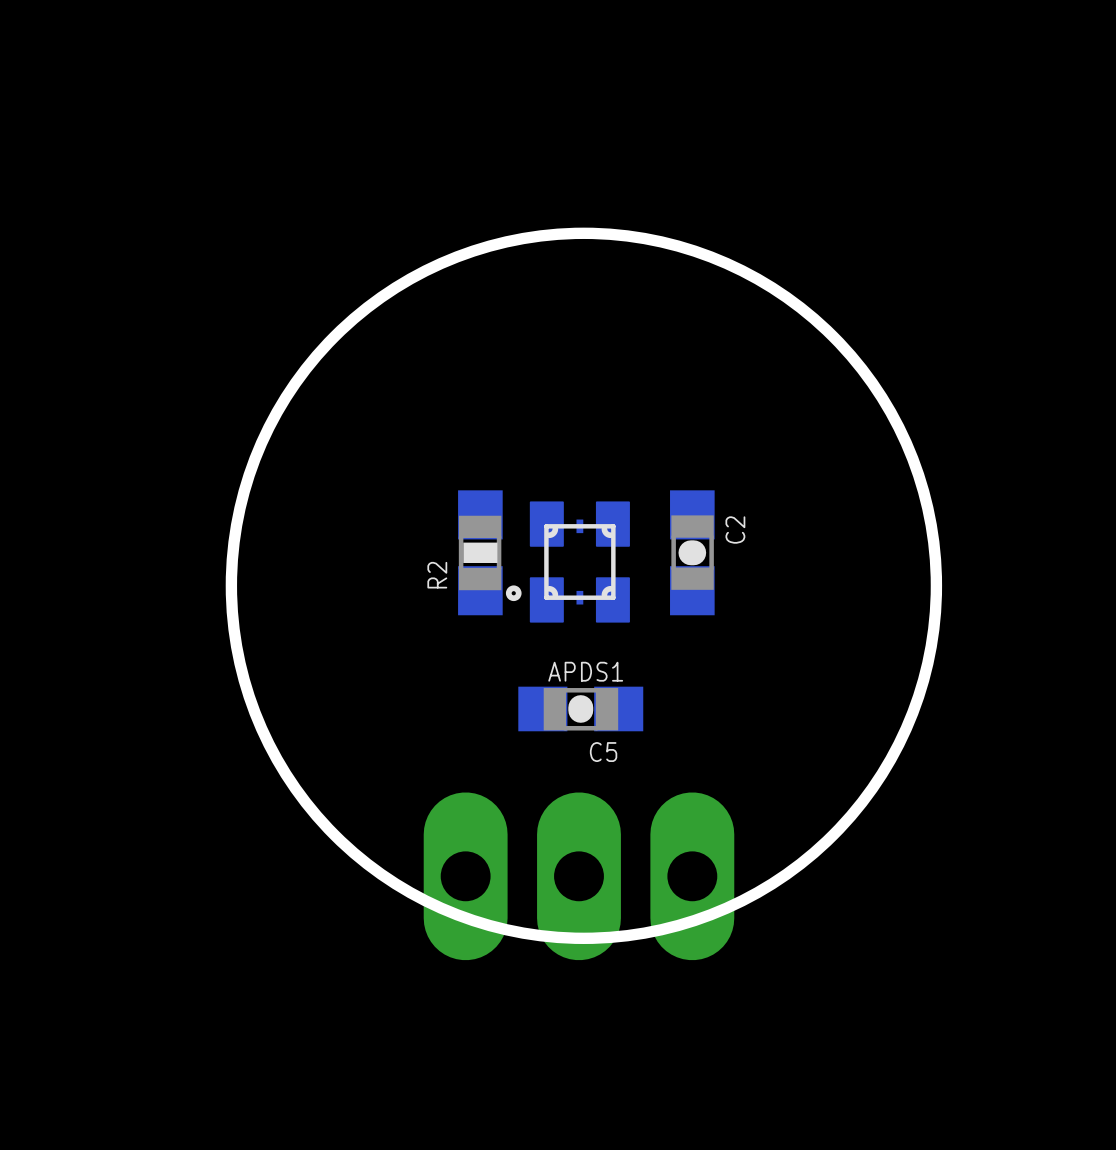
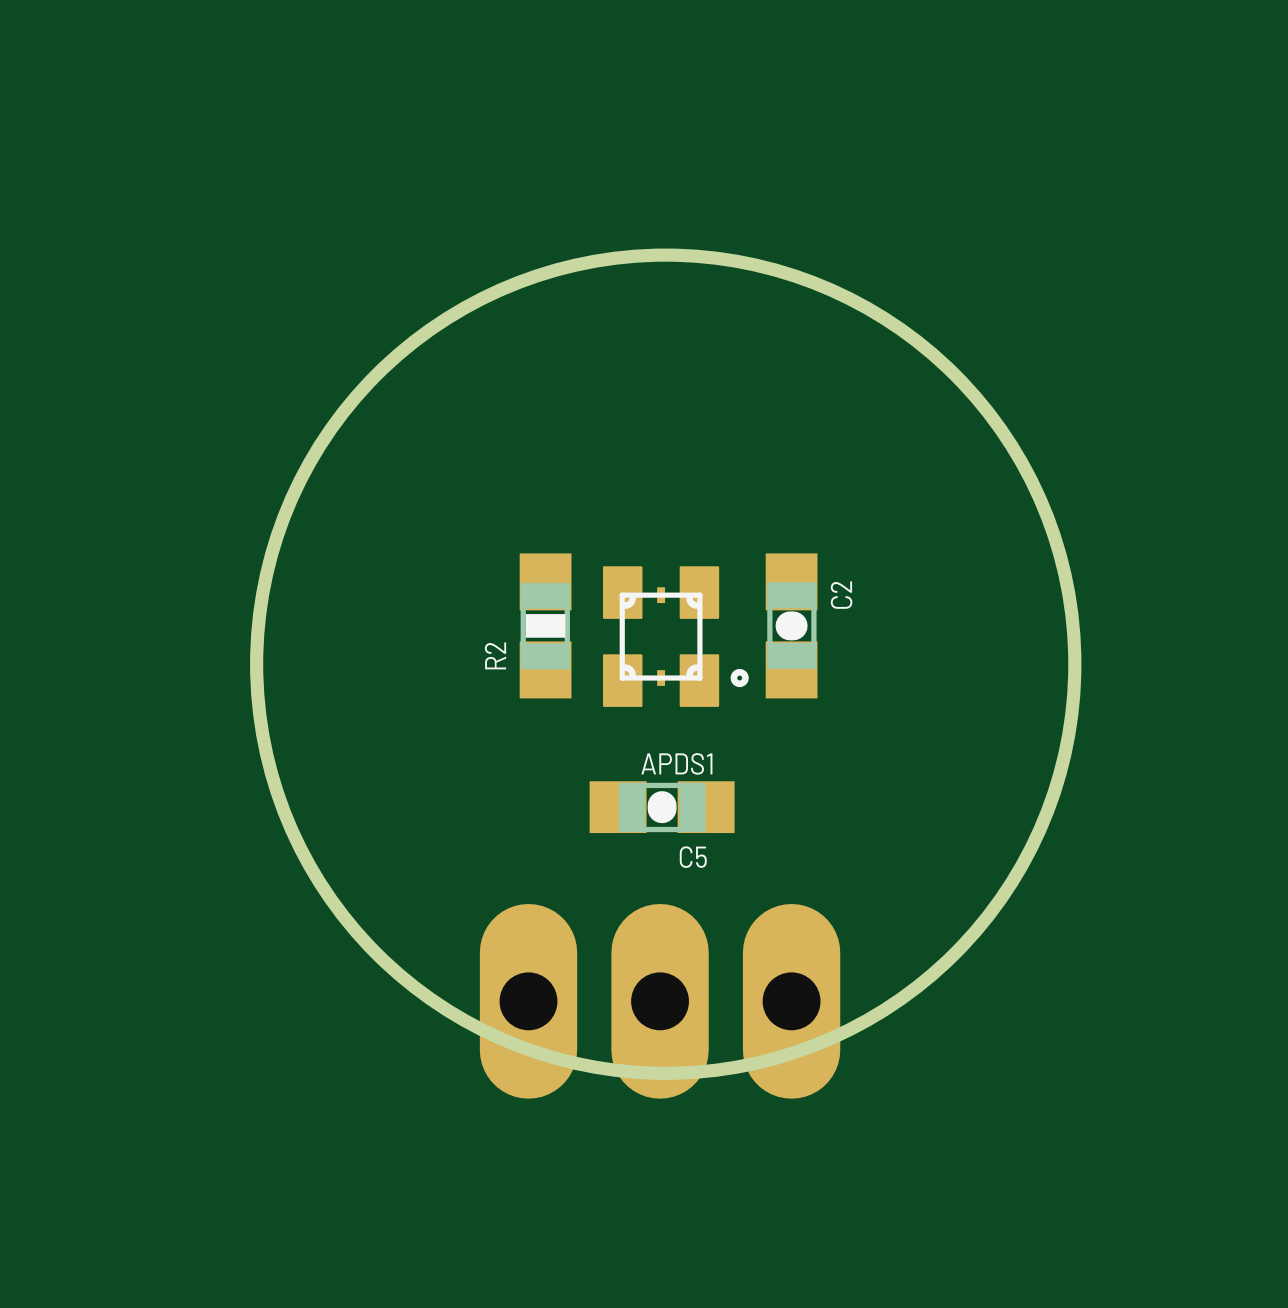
APDS1 footprint: [505, 501, 630, 623] -> [603, 566, 749, 707]

